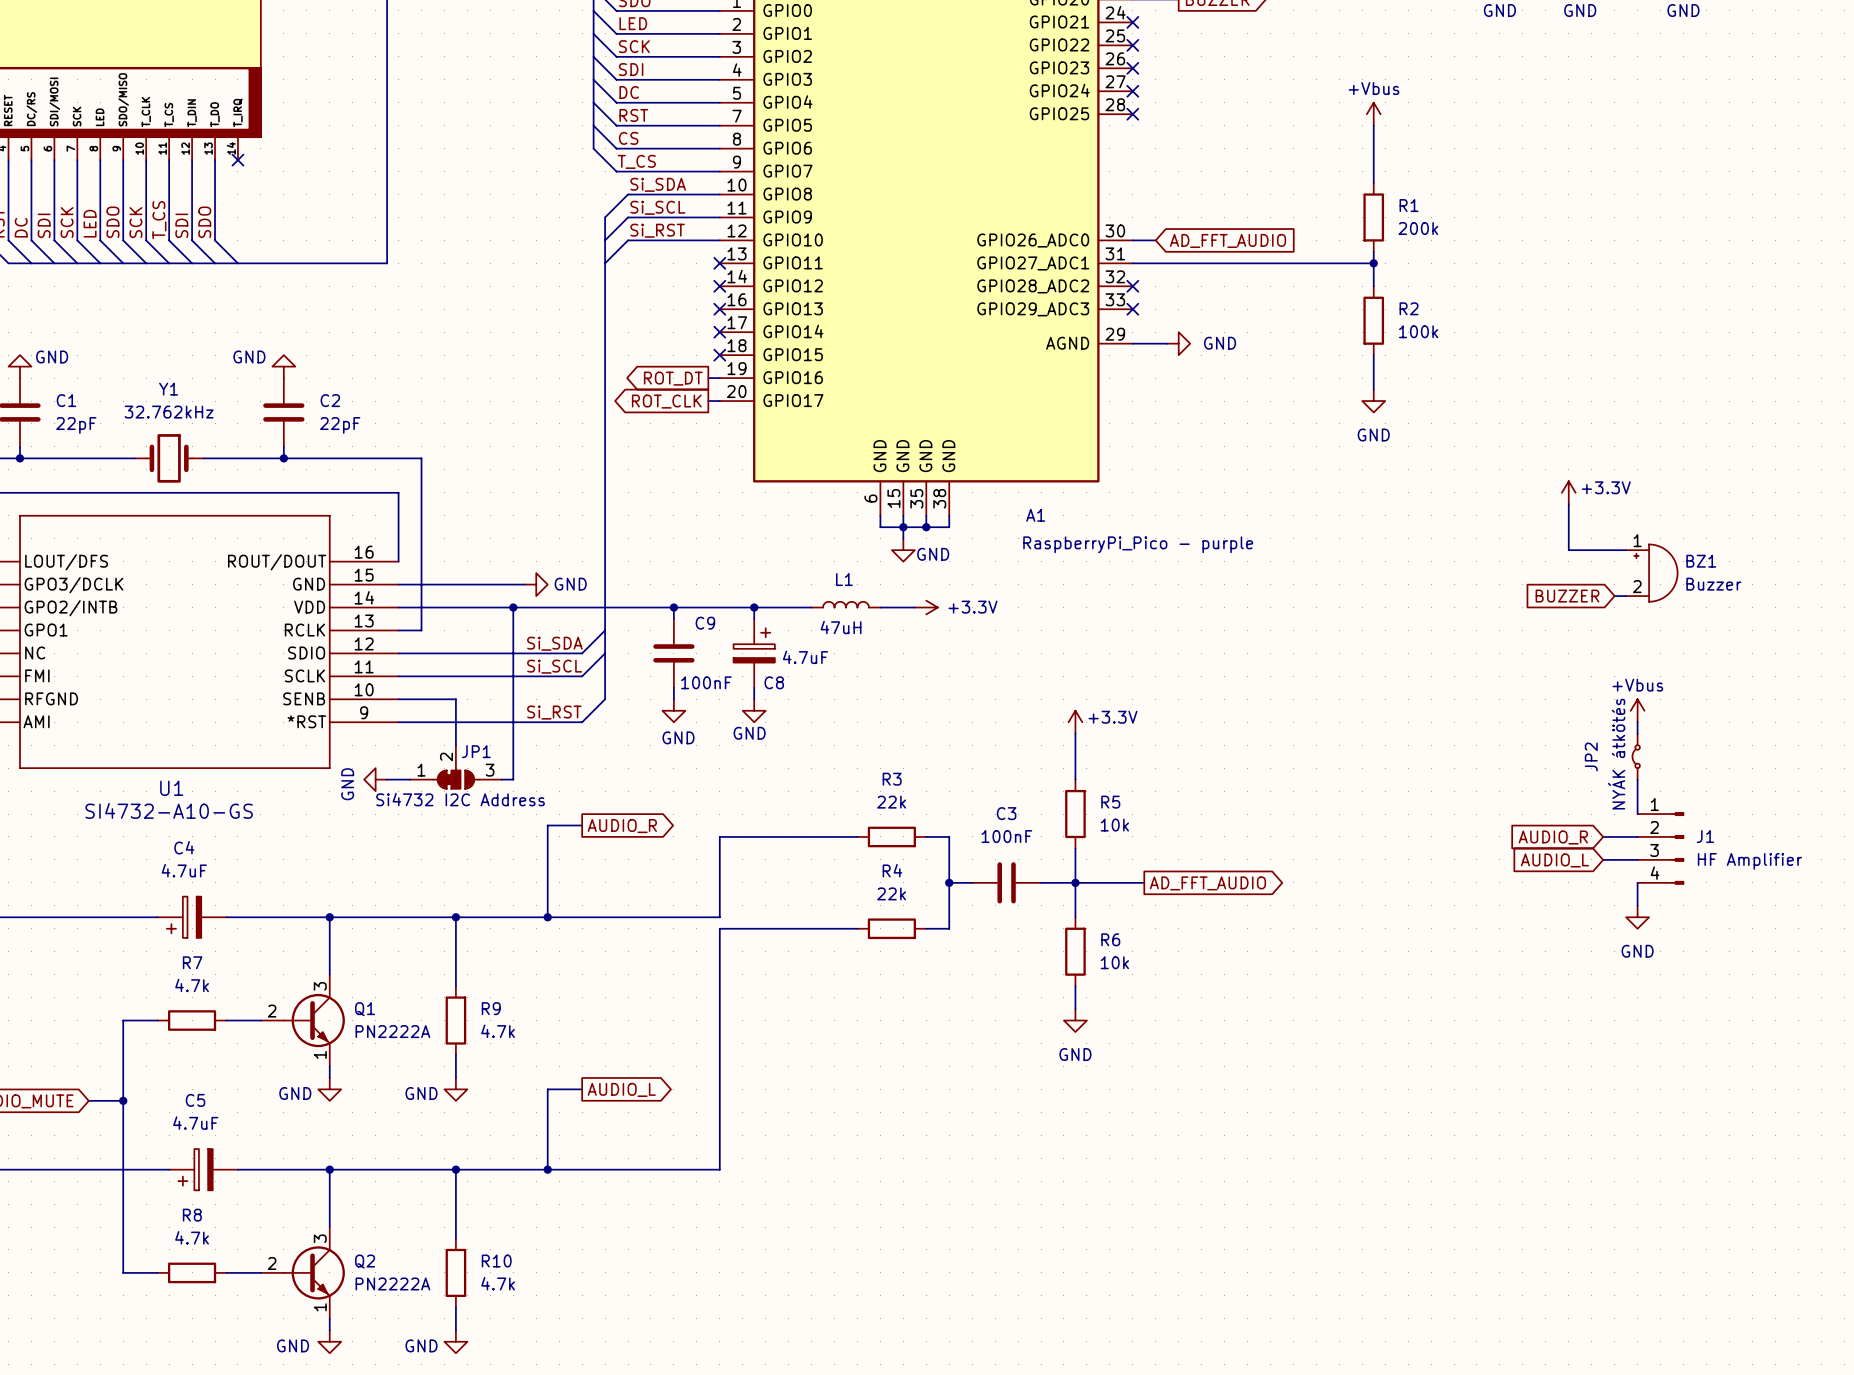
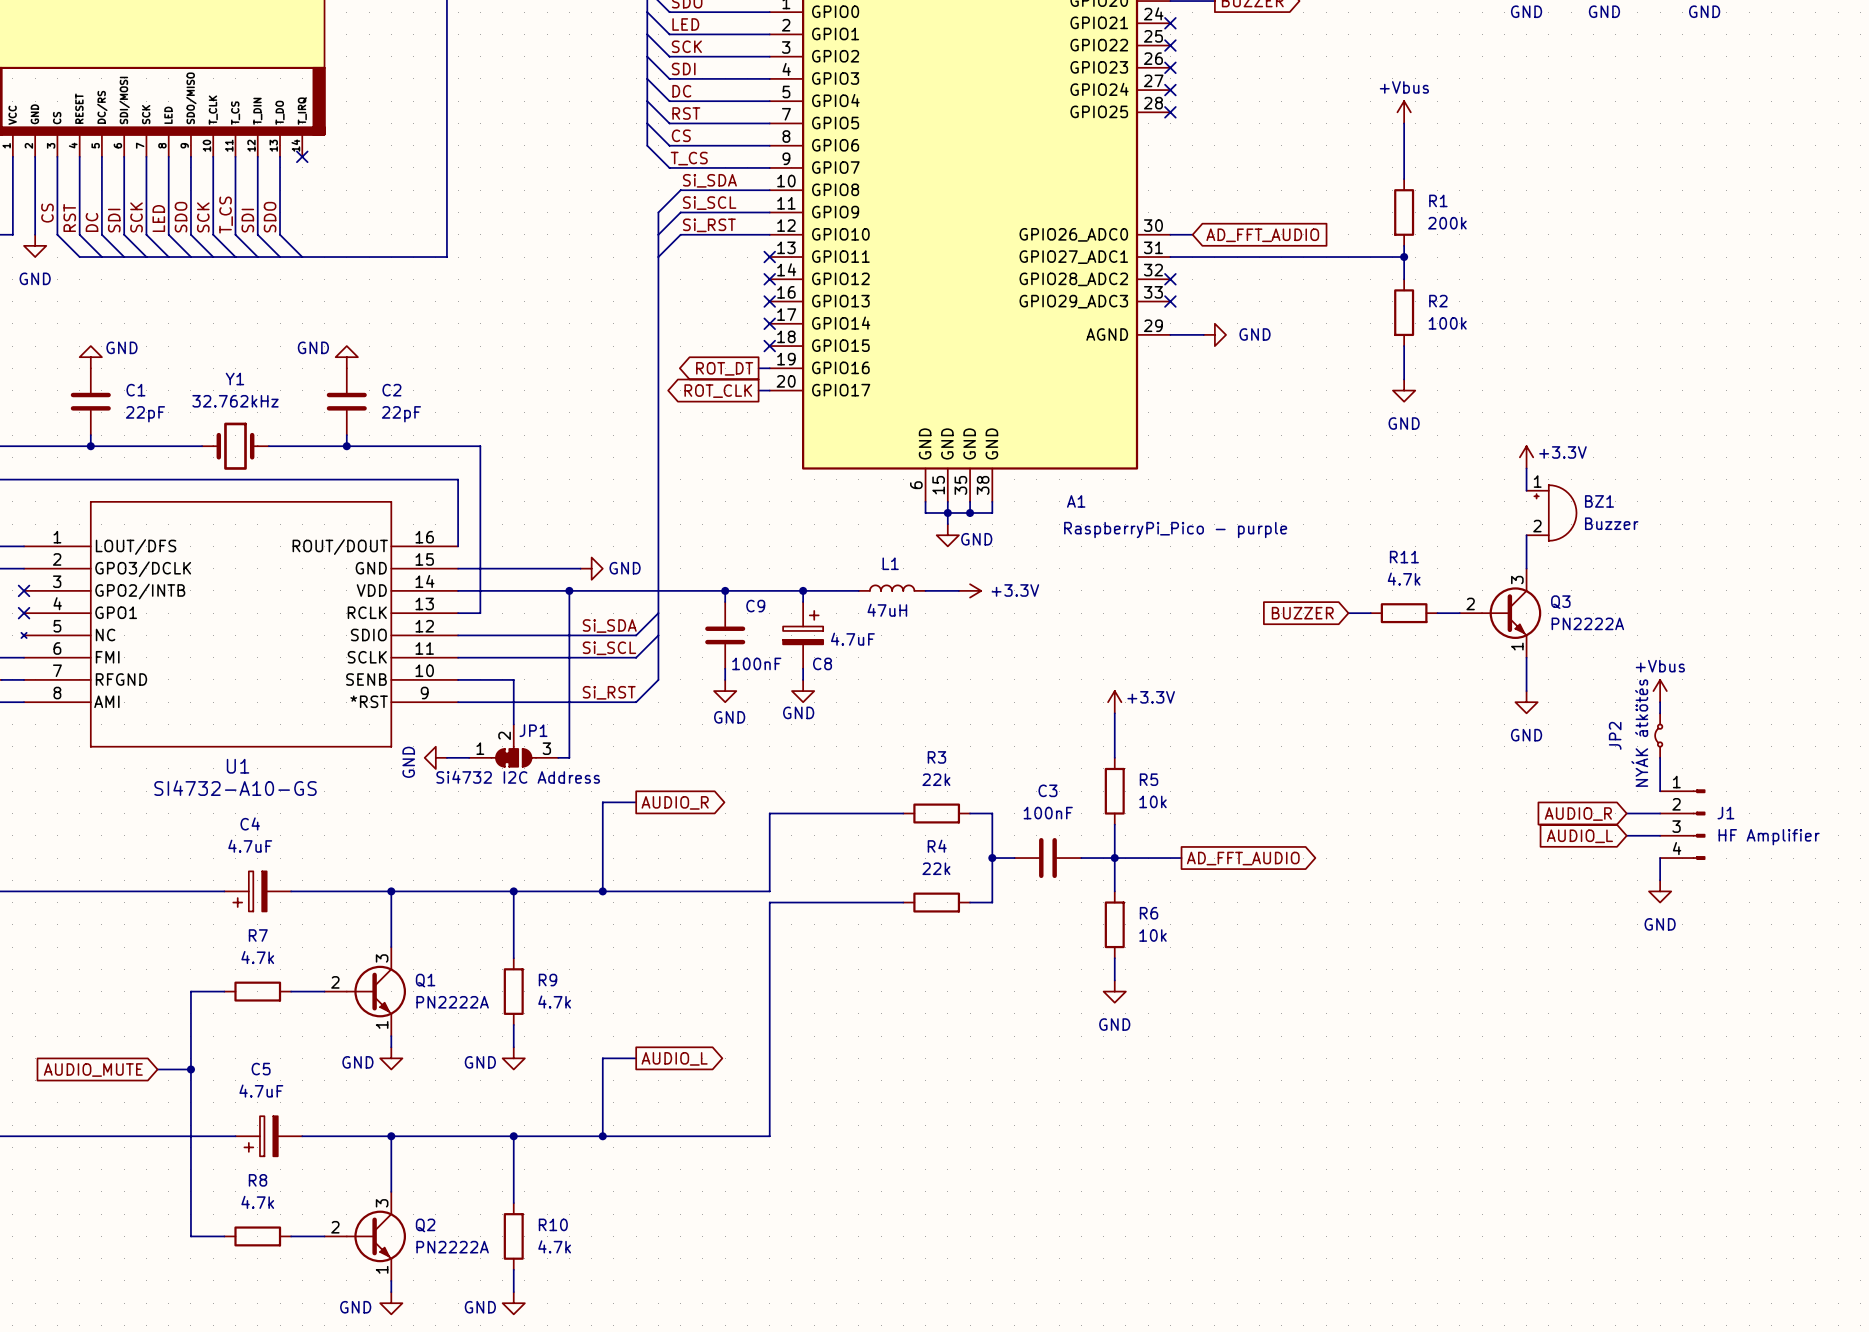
wire: none -> (1526, 468) (1526, 490)
power symbol position: +3.3V (1568, 492) -> +3.3V (1526, 457)
wire: (1568, 504) (1568, 550) (1626, 550) -> none
wire: none -> (1526, 535) (1526, 568)
BZ1 position: (1651, 573) -> (1551, 512)
global label: BUZZER (1567, 596) -> none
wire: (1614, 596) (1626, 596) -> none
global label: none -> BUZZER (1302, 613)
wire: none -> (1348, 613) (1370, 613)
R11: none -> 4.7k (1404, 613)
wire: none -> (1437, 613) (1459, 613)
Q3: none -> PN2222A (1500, 613)
wire: none -> (1526, 657) (1526, 691)
power symbol: none -> GND (1526, 702)

